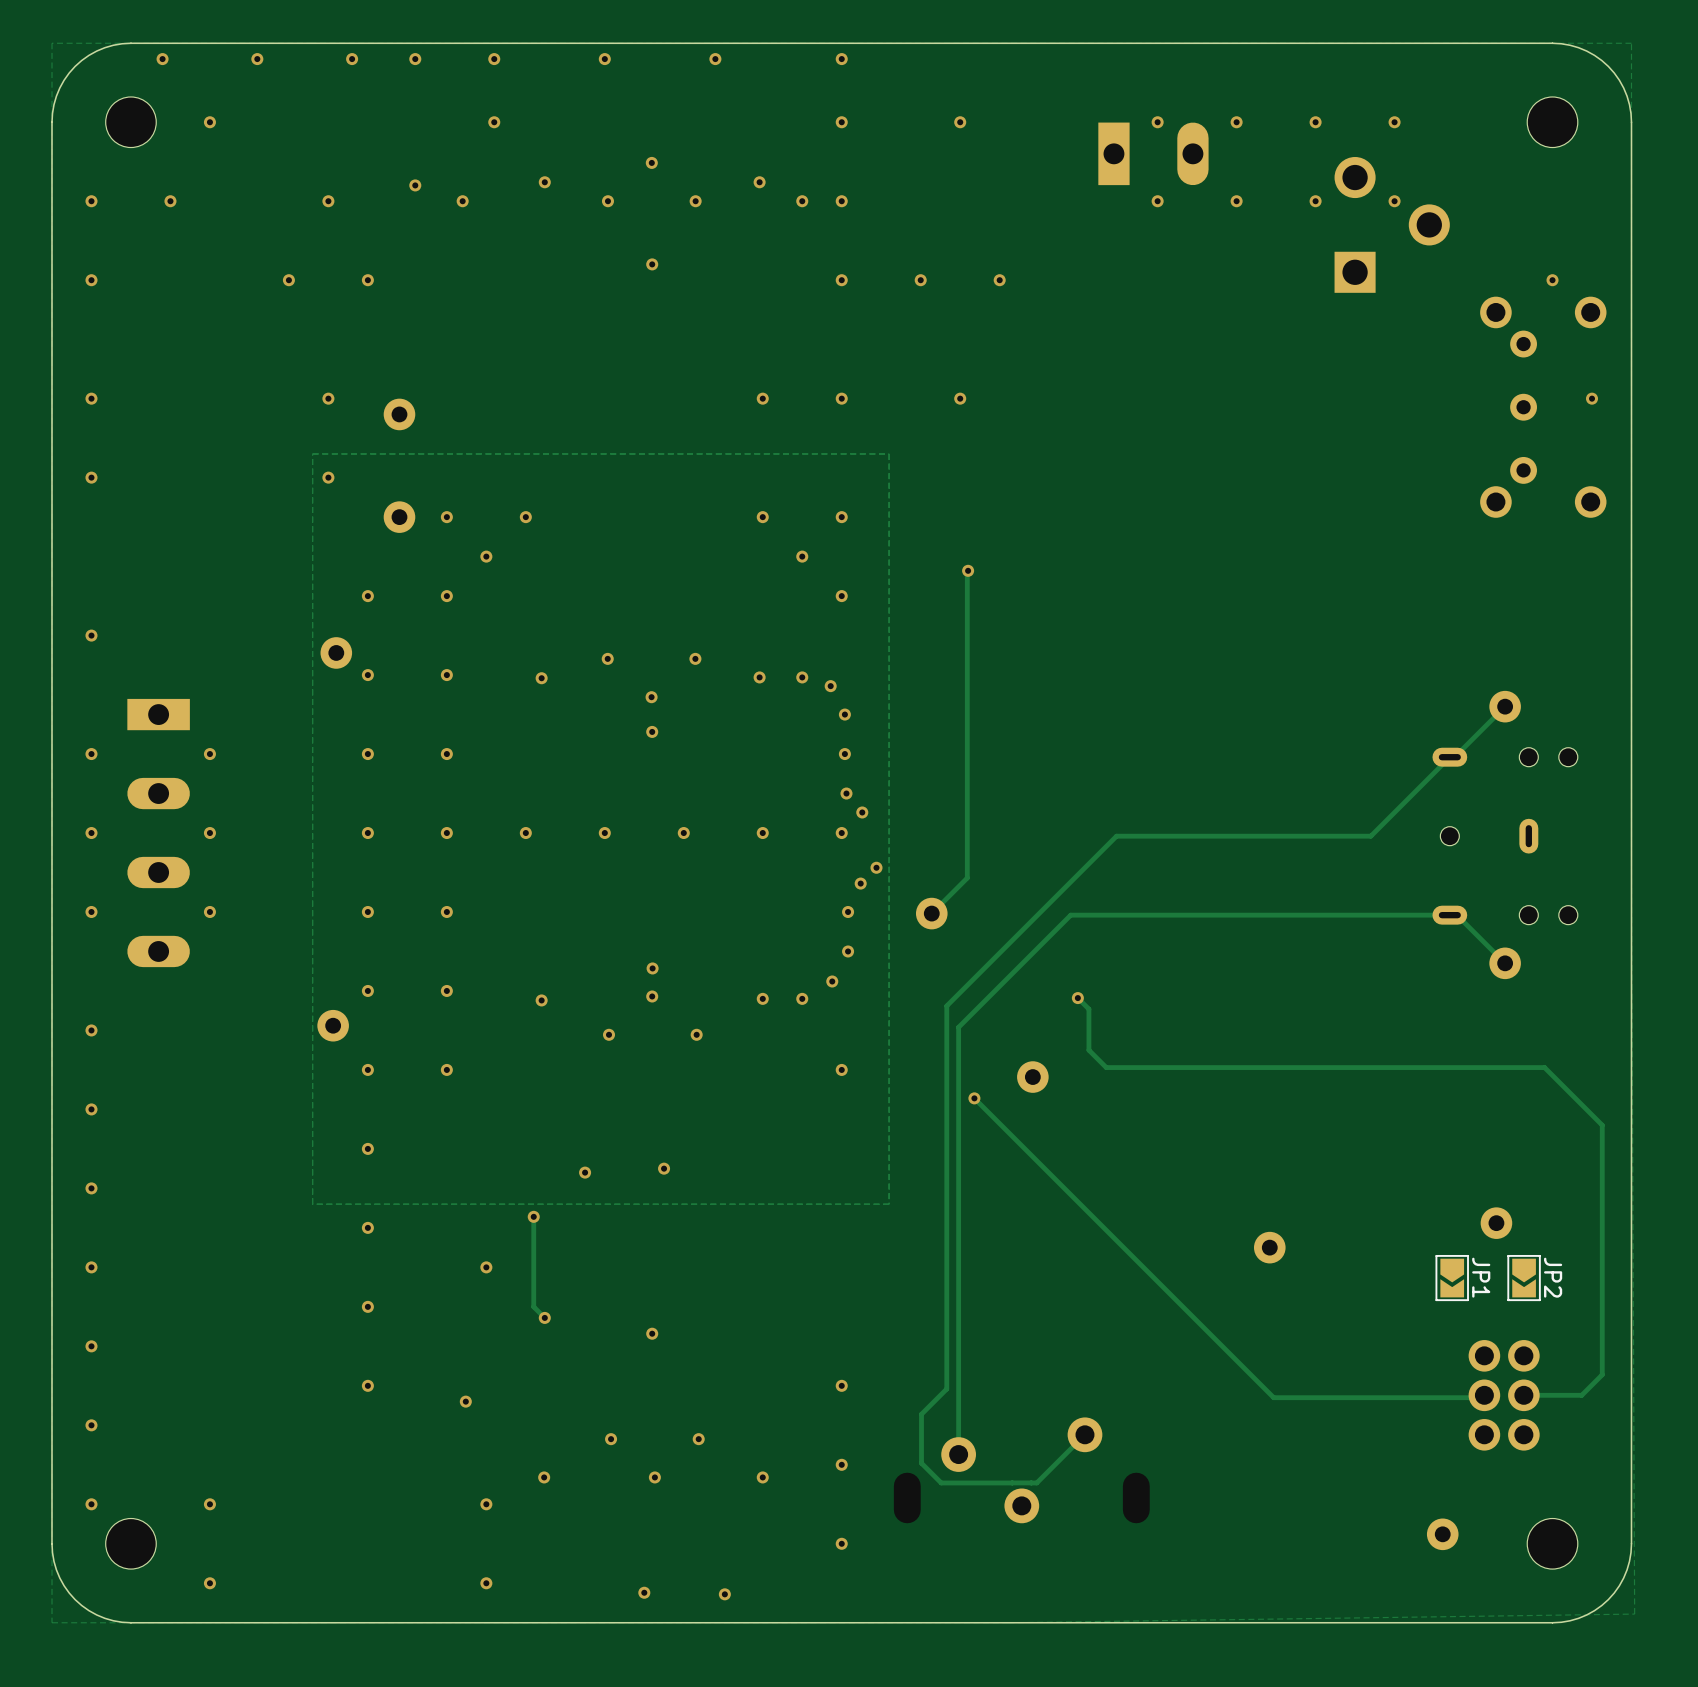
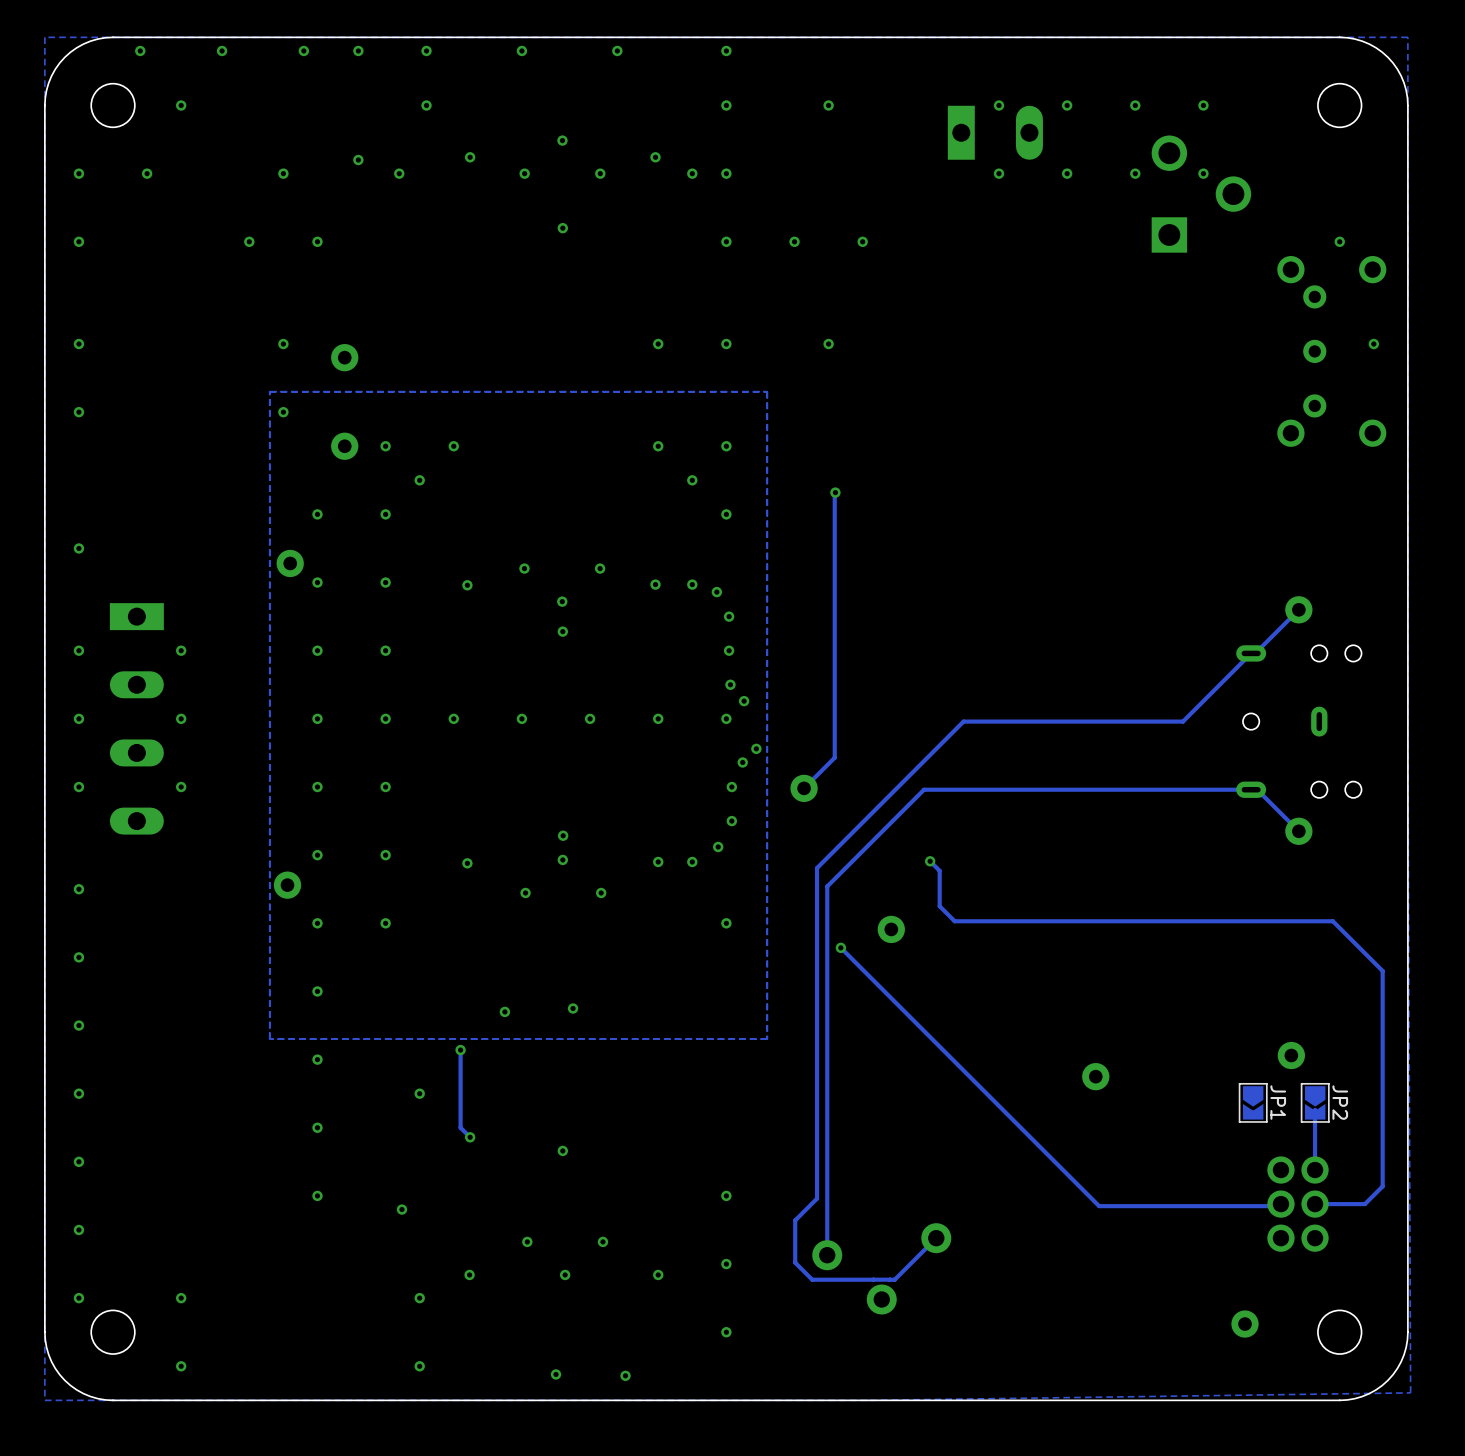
track: none -> (1315, 1110) (1315, 1170)

